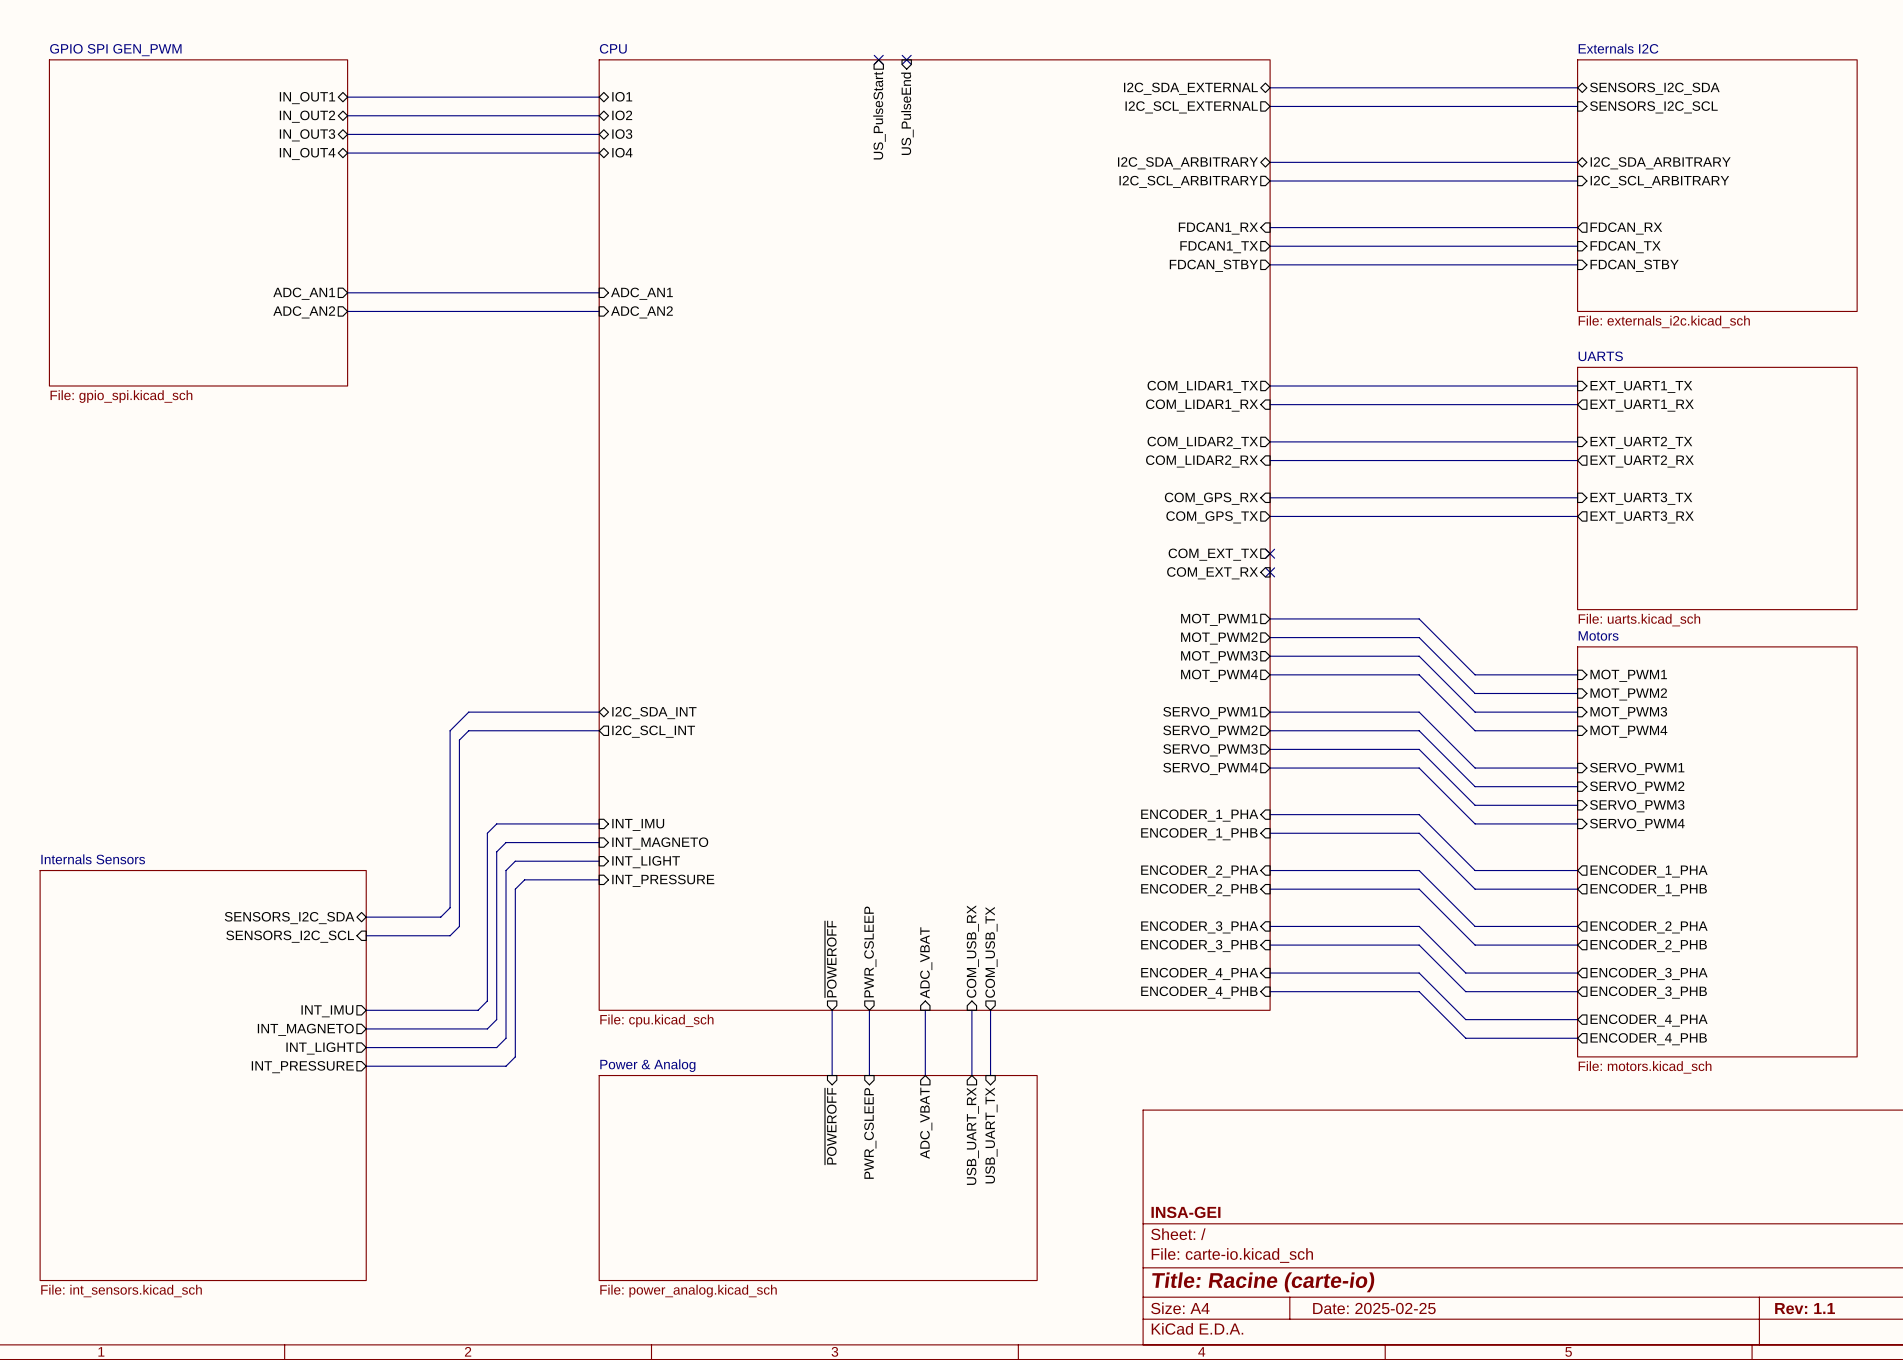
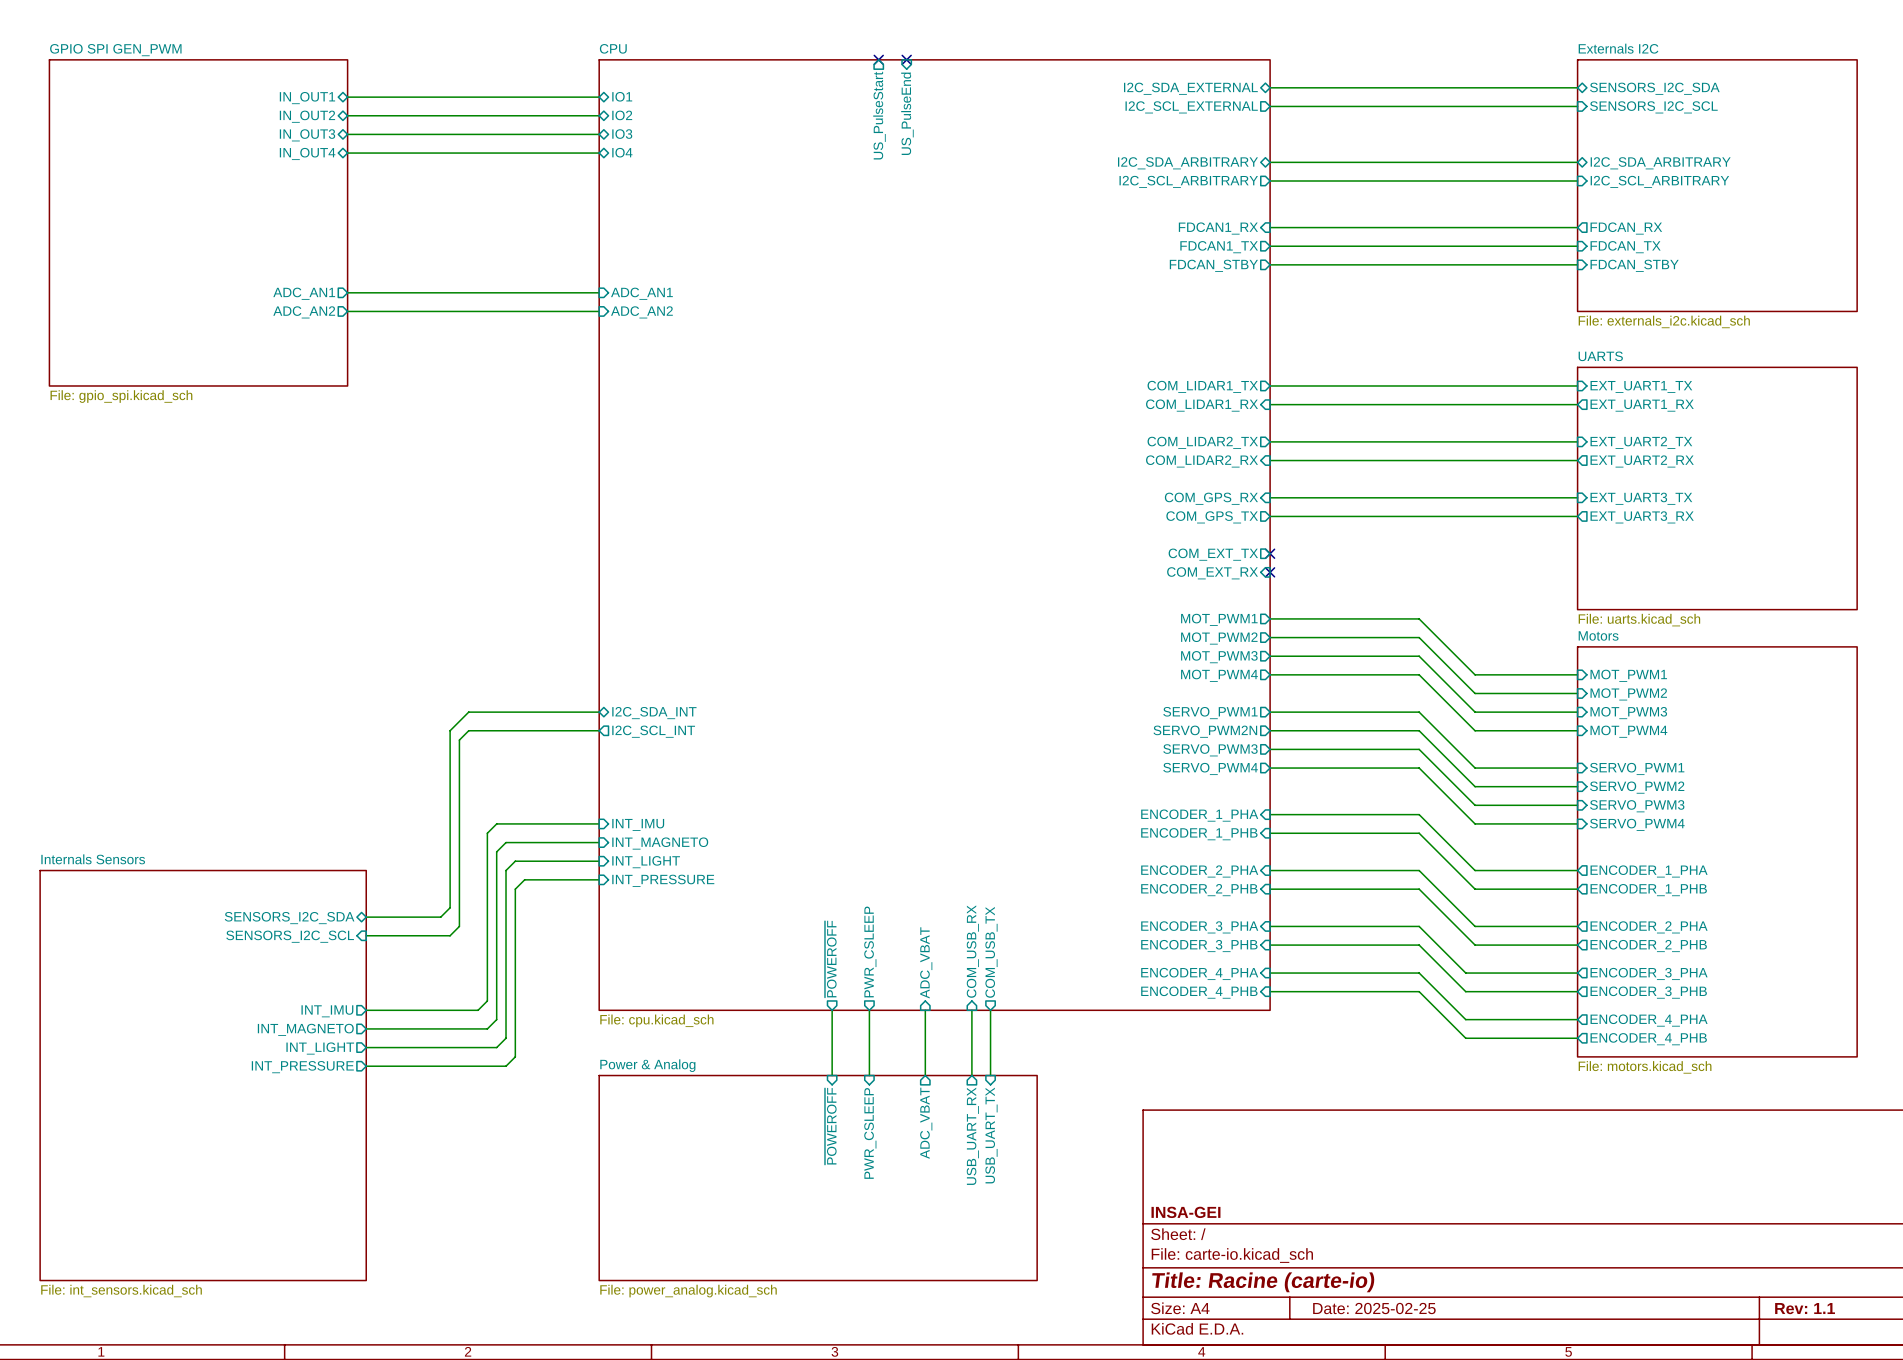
sheet pin: SERVO_PWM2 (1210, 731) -> SERVO_PWM2N (1205, 731)

